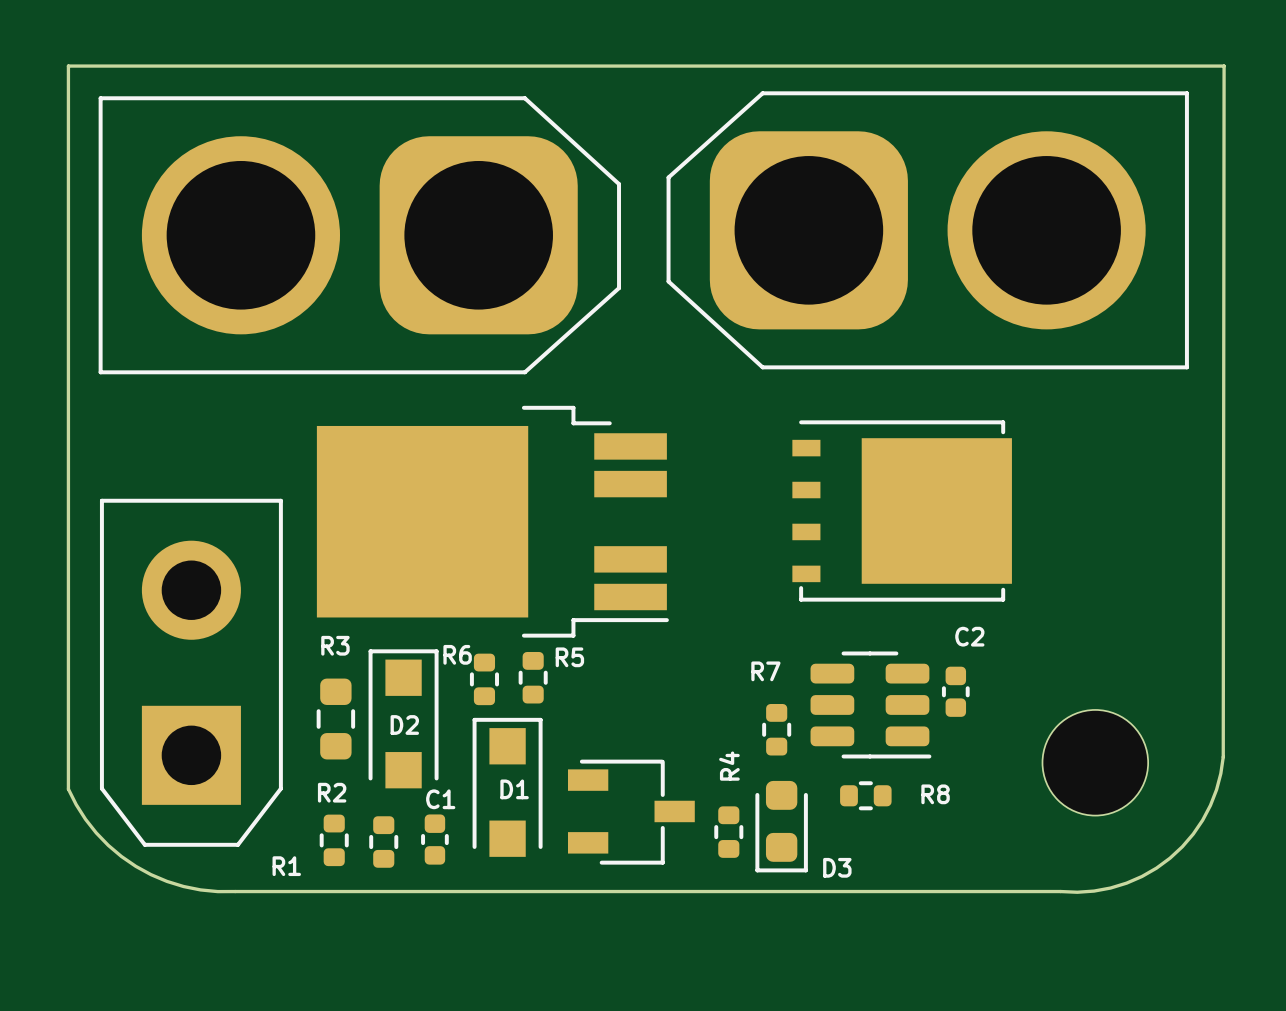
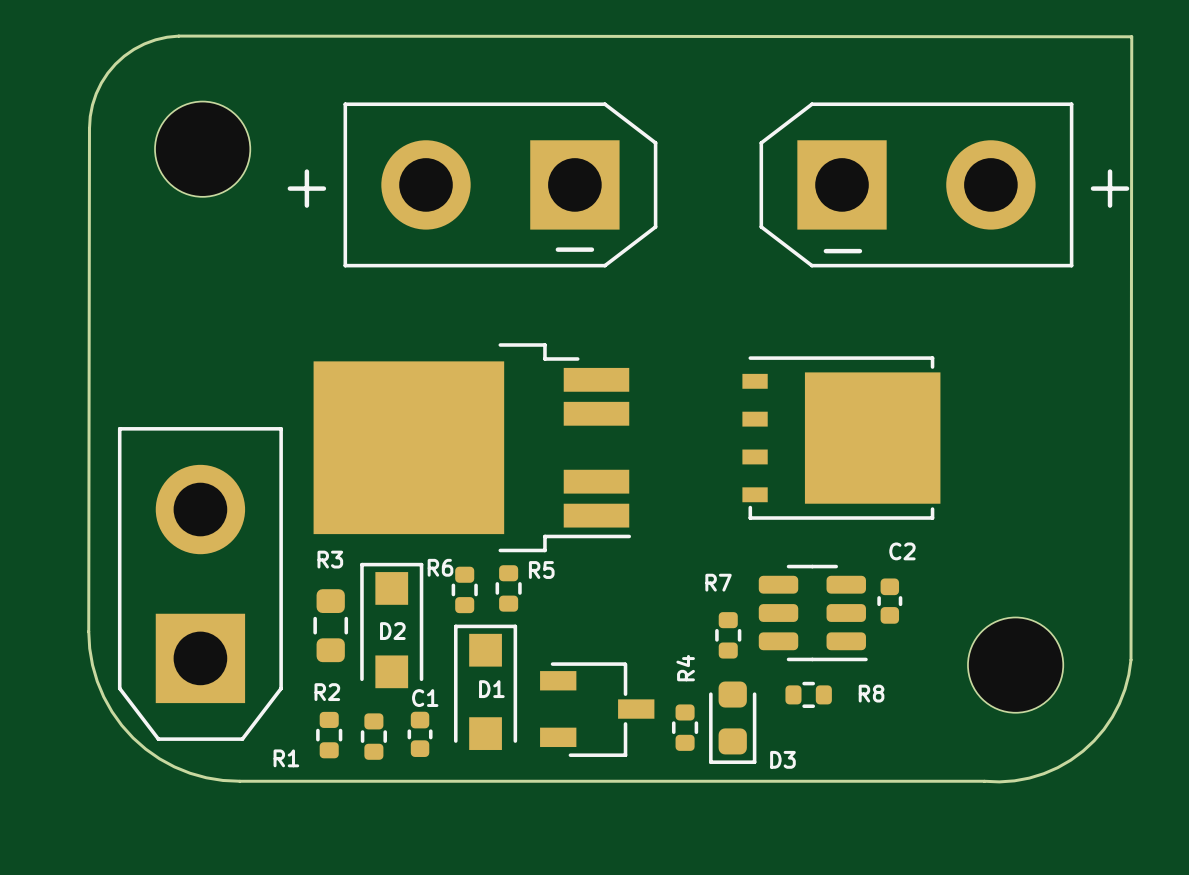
board edge: (1224, 66) (68, 66) (68, 789) (76, 804) (96, 832) (108, 845) (135, 866) (151, 874) (183, 886) (217, 891) (235, 891) -> (1131, 36) (178, 36) (155, 39) (144, 43) (124, 56) (107, 73) (96, 93) (90, 116) (89, 128) (89, 648) (97, 681) (111, 711) (121, 725) (145, 749) (159, 758) (190, 773) (206, 777) (239, 781)
part: none -> (202, 149)
part: none -> (500, 184)
part: (927, 230) -> none
part: none -> (916, 184)
part: (359, 235) -> none

